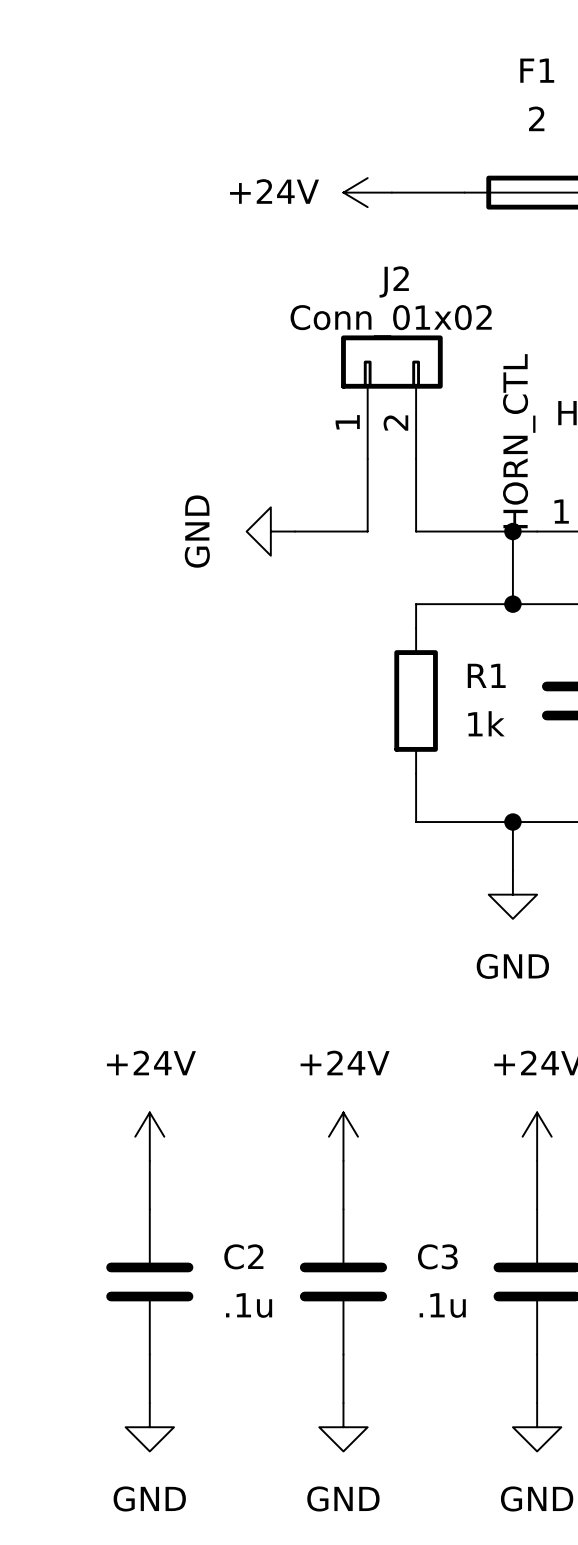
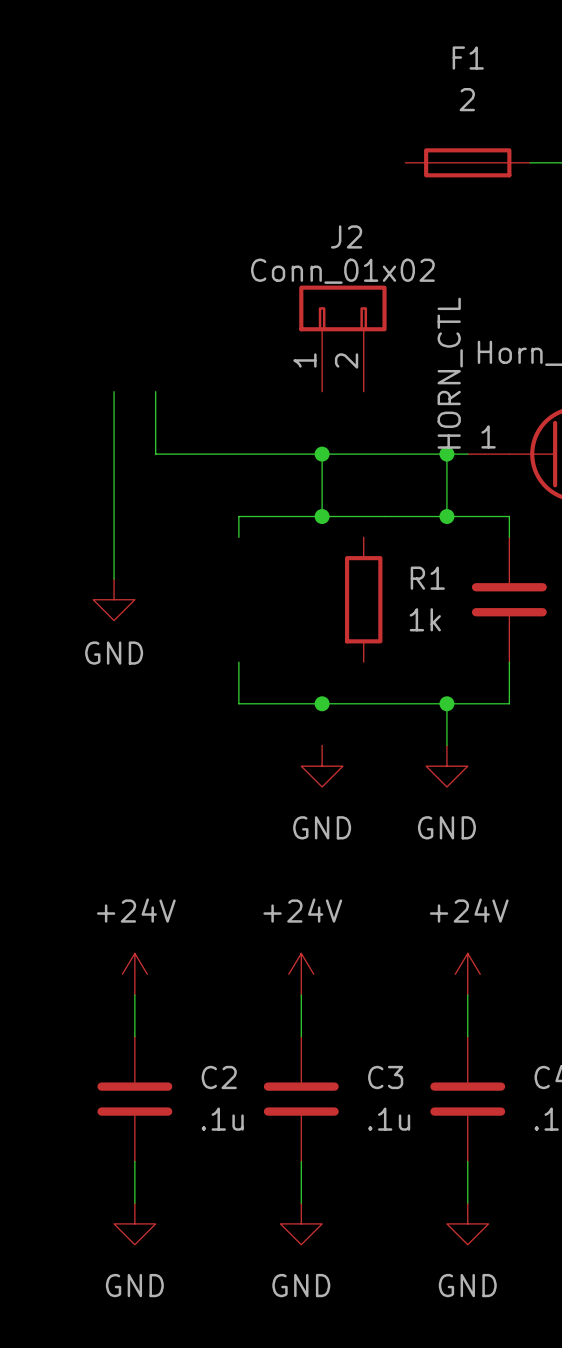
power symbol: +24V (367, 192) -> none
wire: (391, 192) (464, 192) -> none
wire: none -> (114, 391) (114, 578)
wire: none -> (155, 391) (155, 454) (259, 454)
wire: (367, 458) (367, 531) -> none
wire: (416, 458) (416, 531) -> (322, 516) (322, 454) (363, 454)
power symbol: GND (270, 531) -> none
junction: none -> (322, 454)
junction: none -> (322, 516)
wire: (416, 604) (416, 628) -> (363, 516) (238, 516) (238, 537)
power symbol: none -> GND (114, 599)
wire: (416, 773) (416, 822) -> (238, 662) (238, 703) (363, 703)
junction: none -> (322, 703)
power symbol: none -> GND (322, 766)

